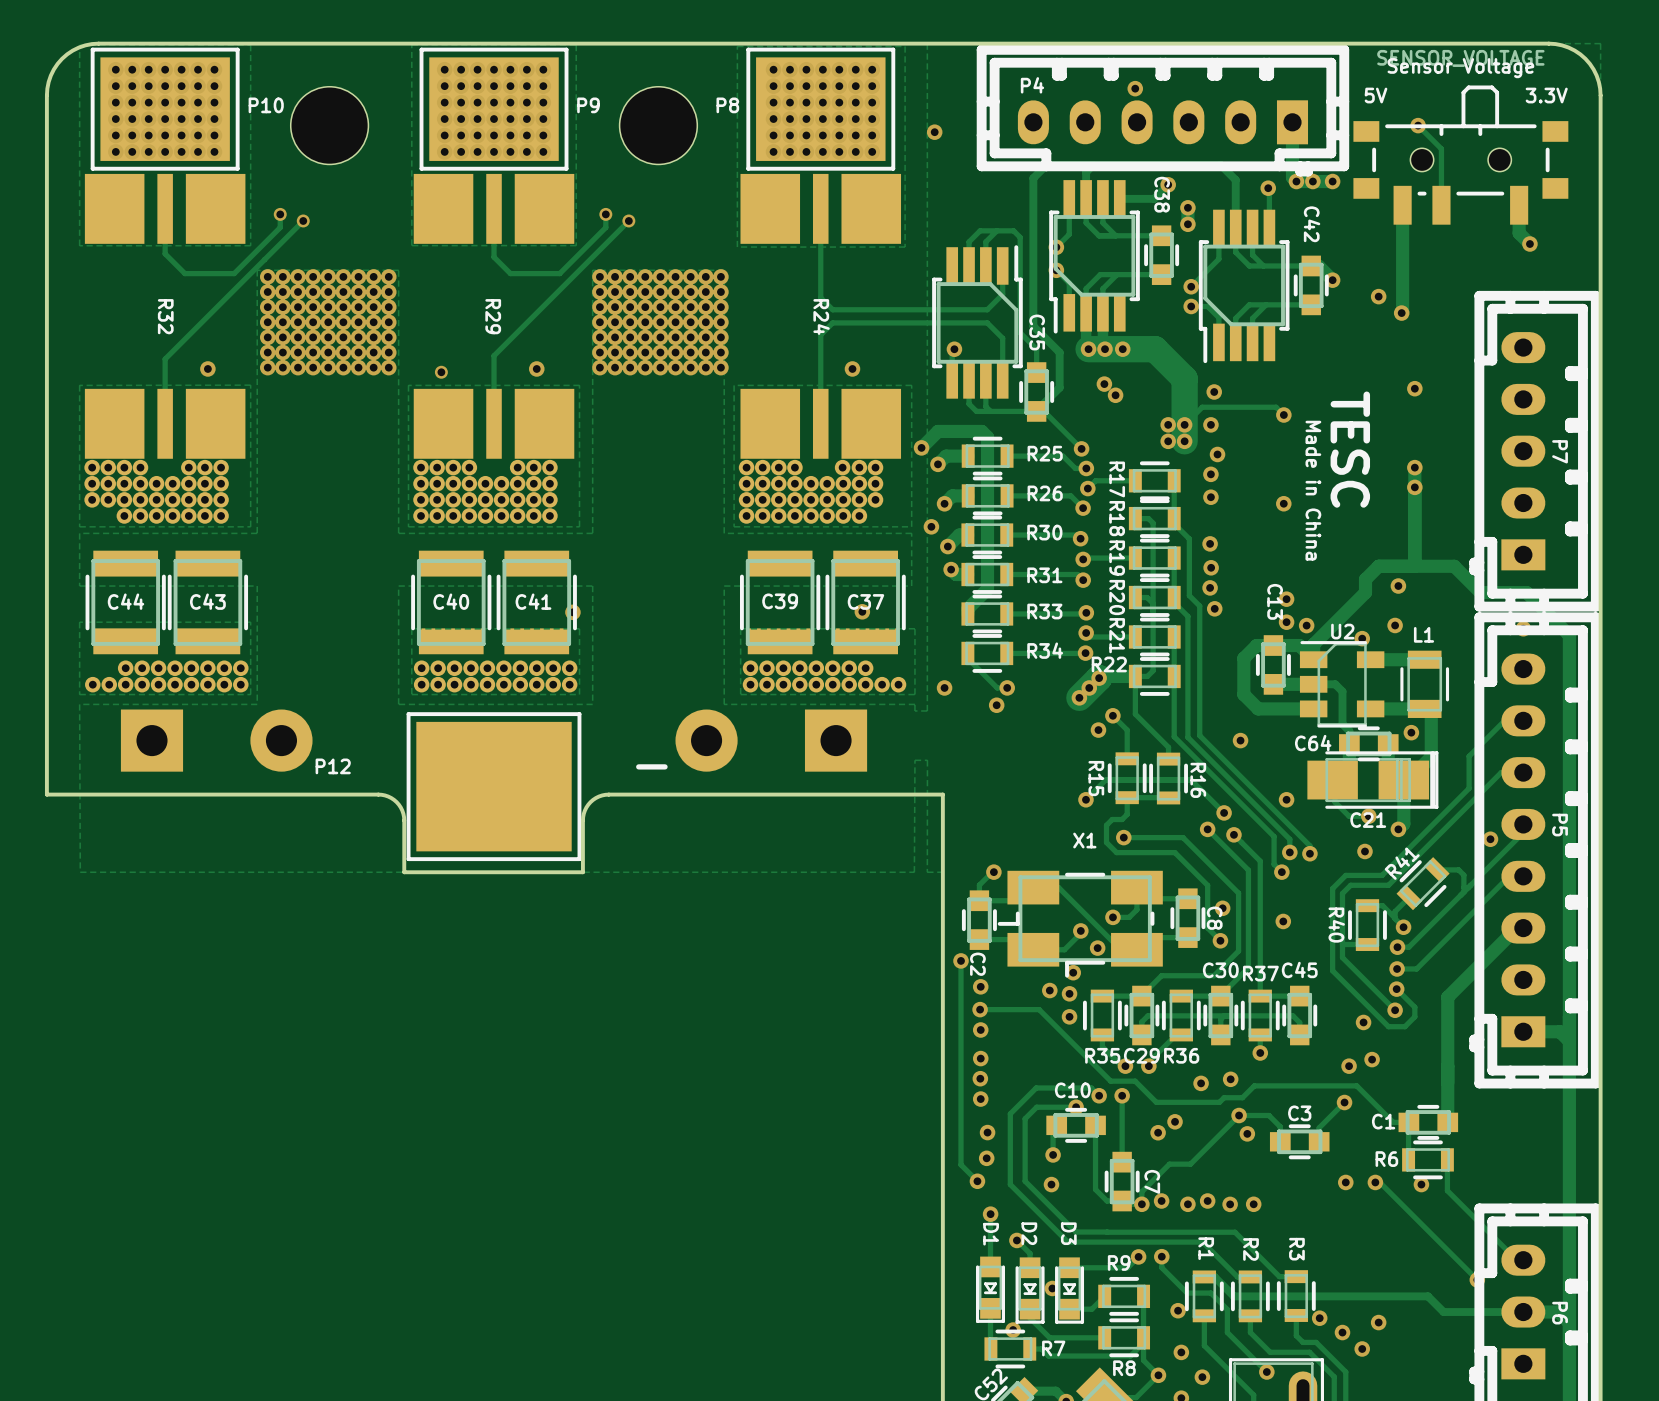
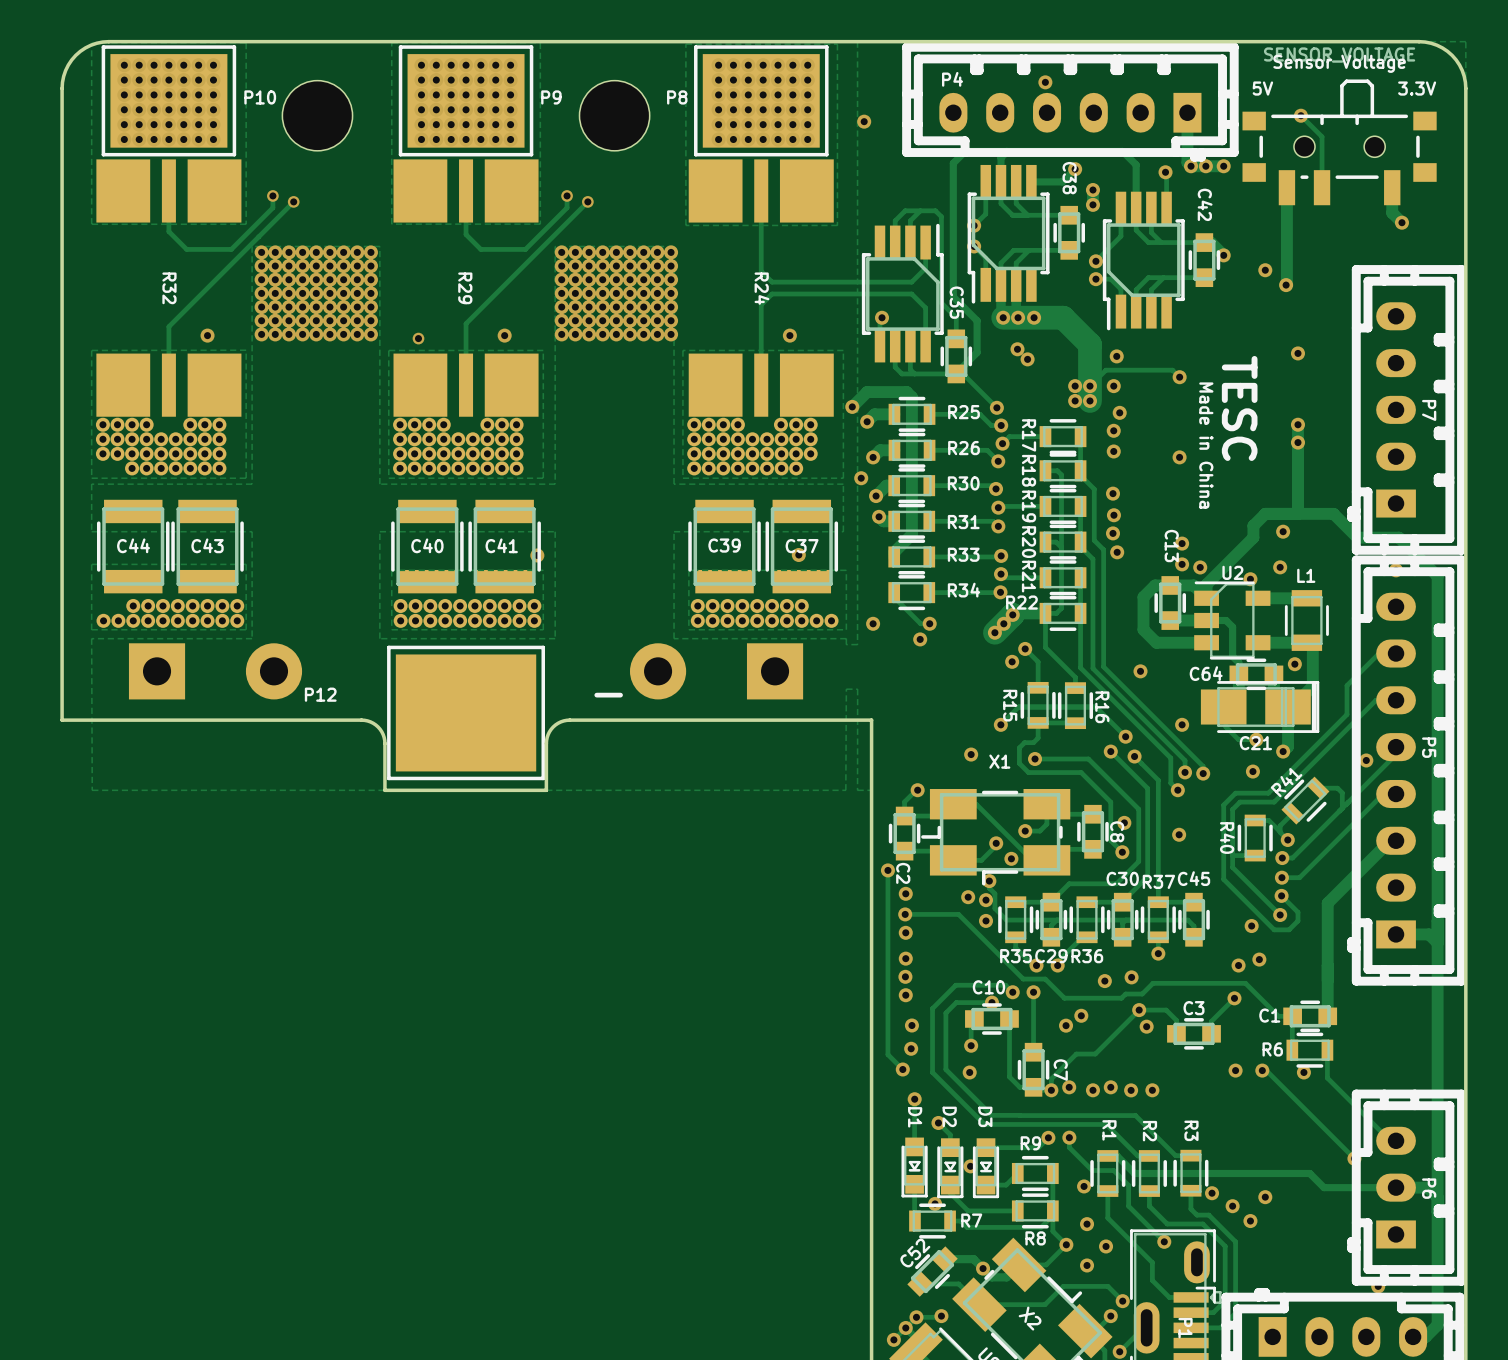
via: none -> (971, 754)
track: none -> (989, 881) (989, 888) (994, 893) (994, 908) (1006, 920) (1056, 920)

